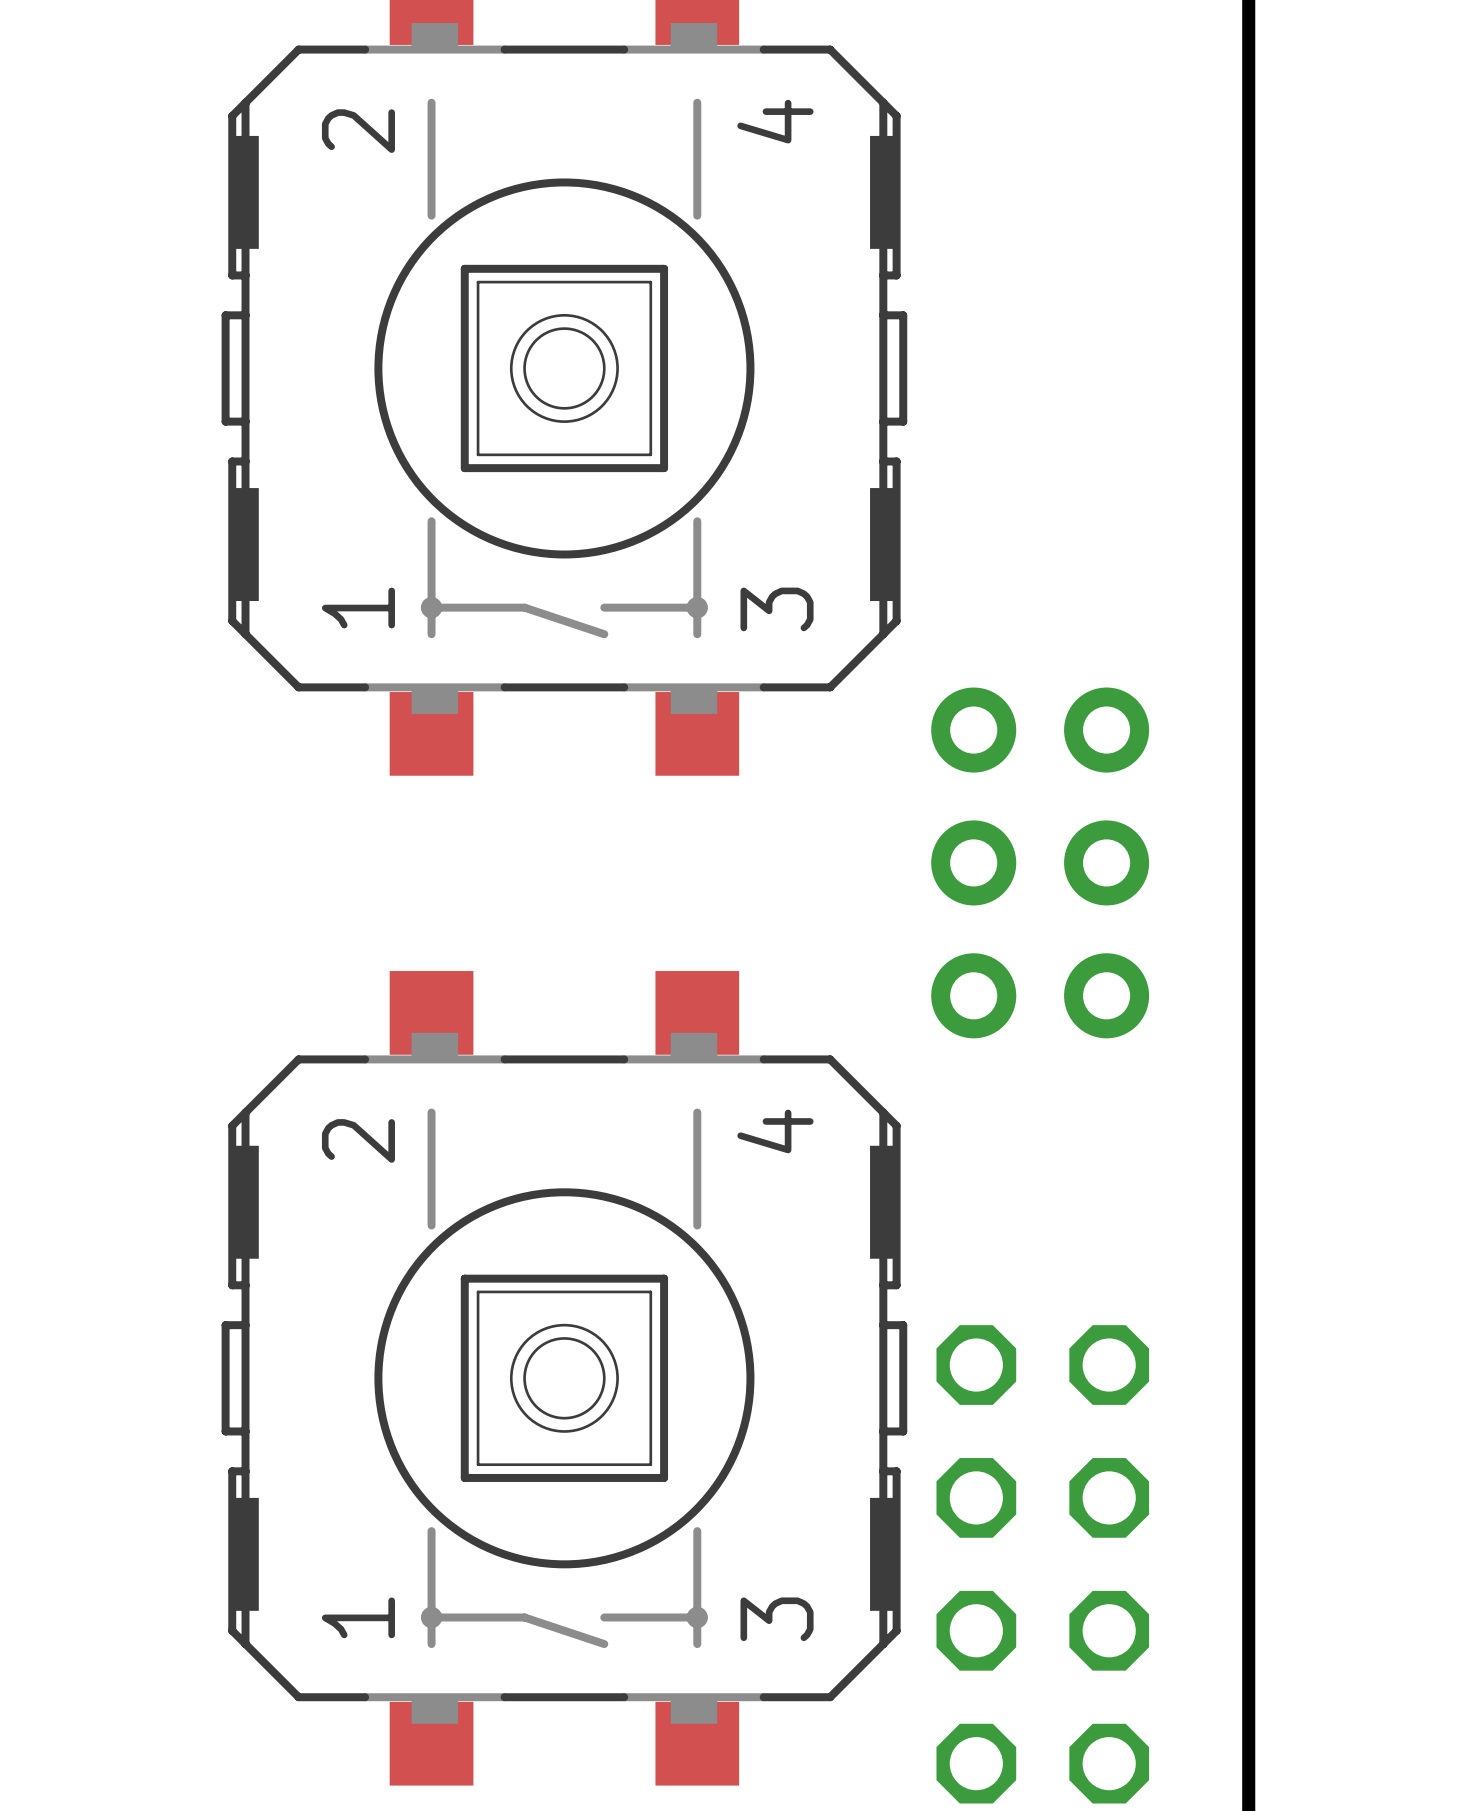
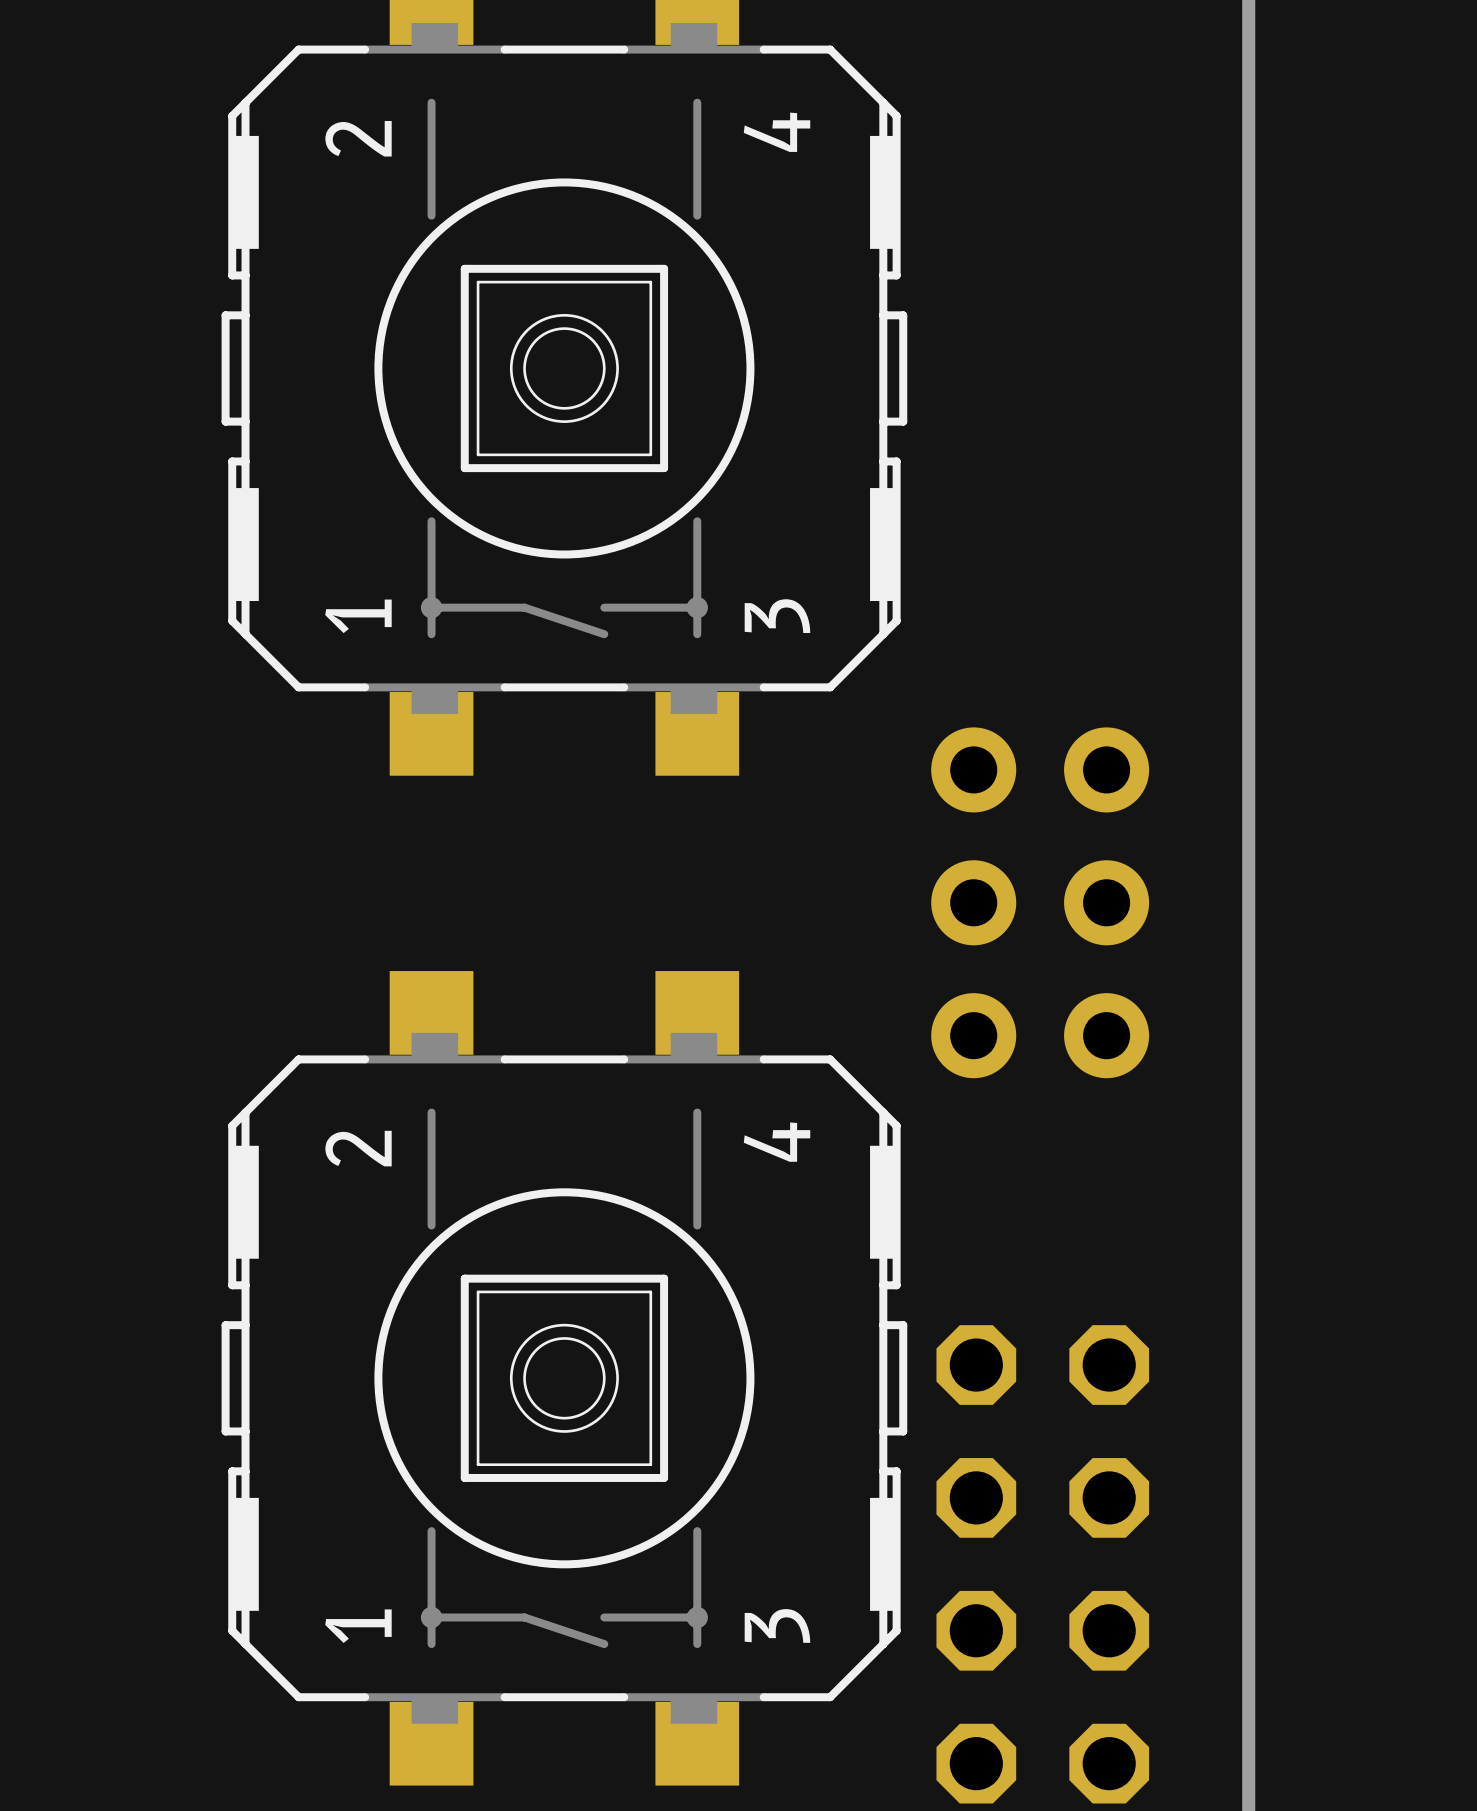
part position: (1040, 862) -> (1040, 902)

